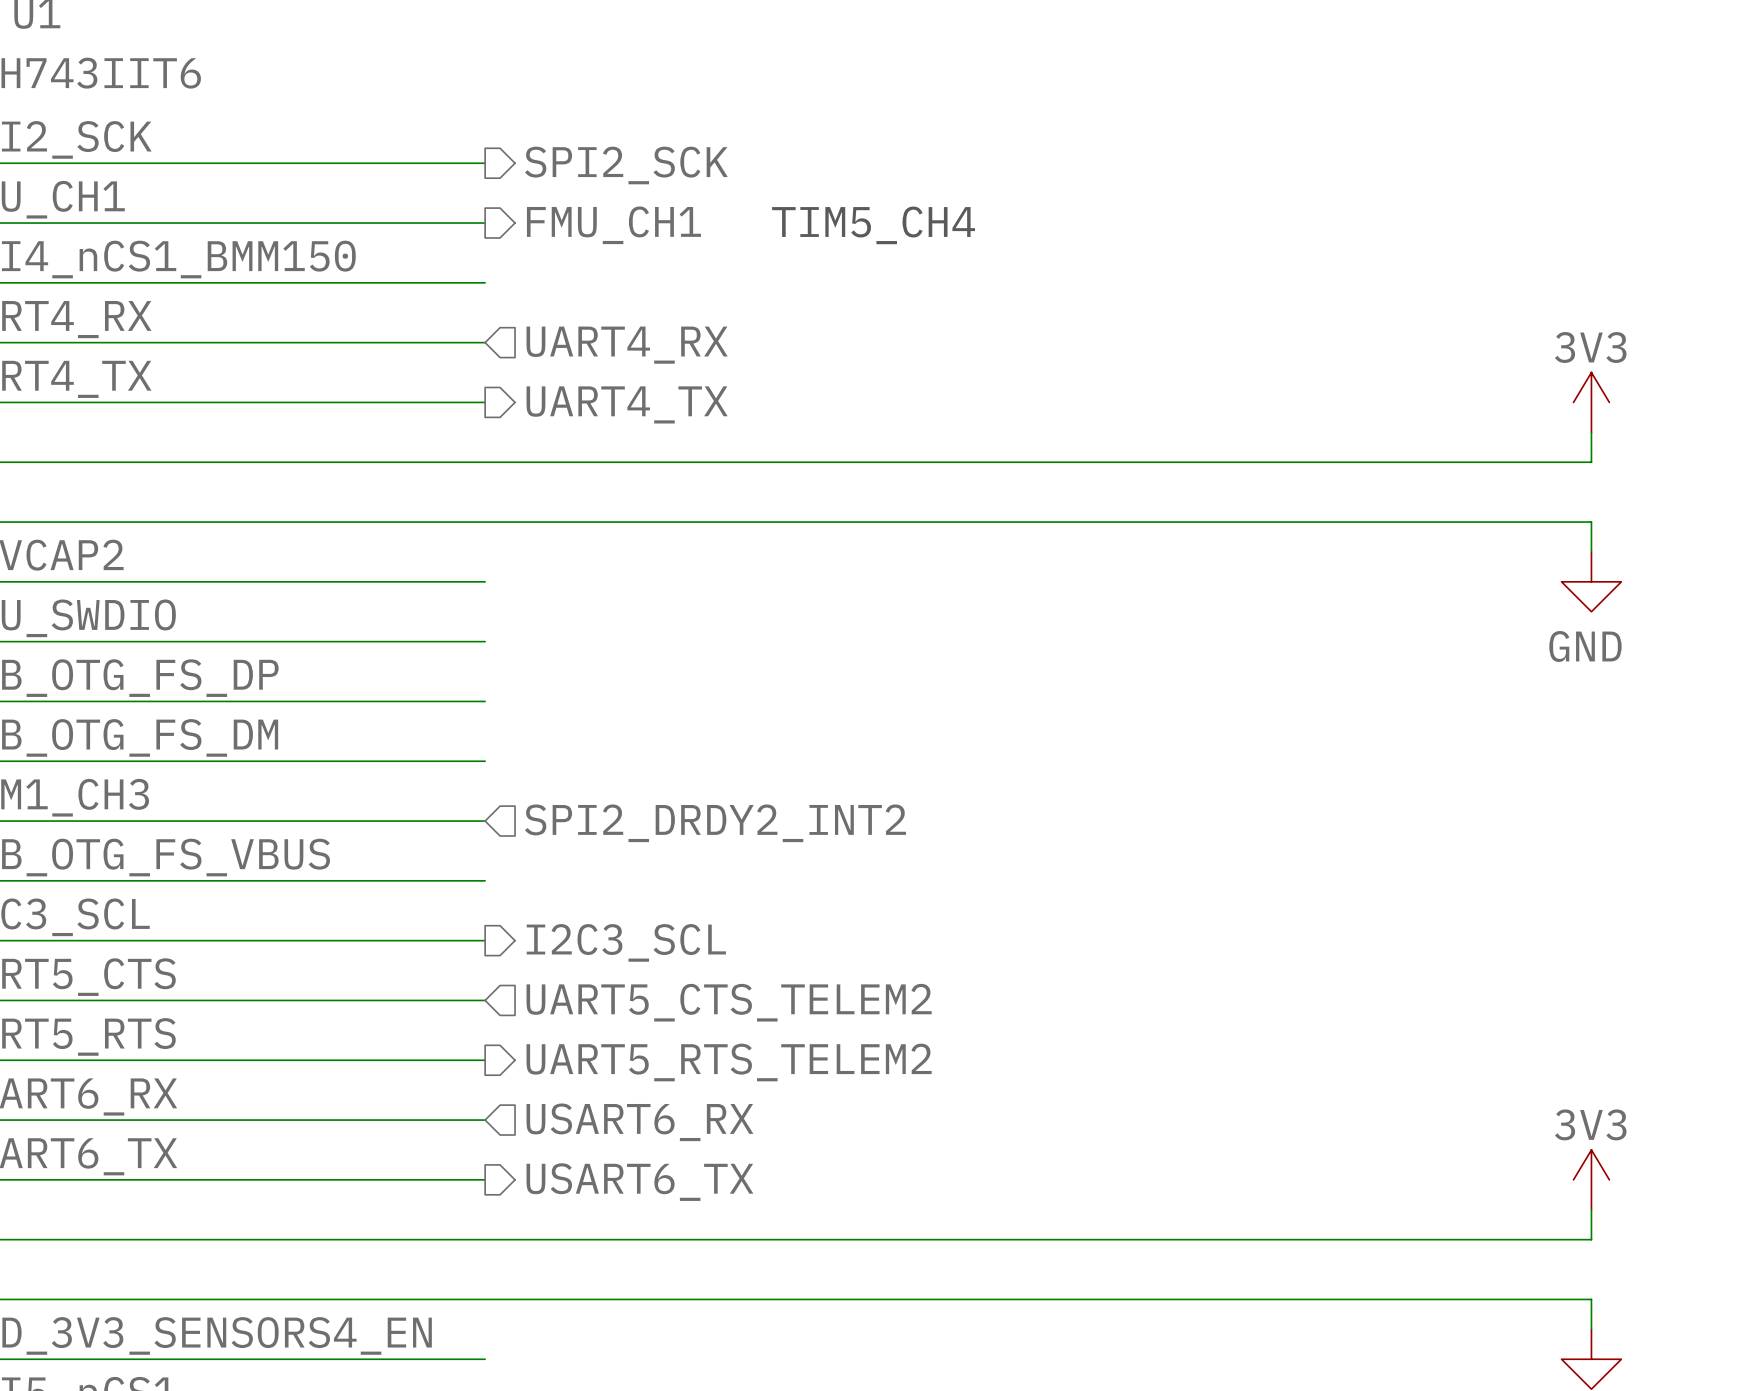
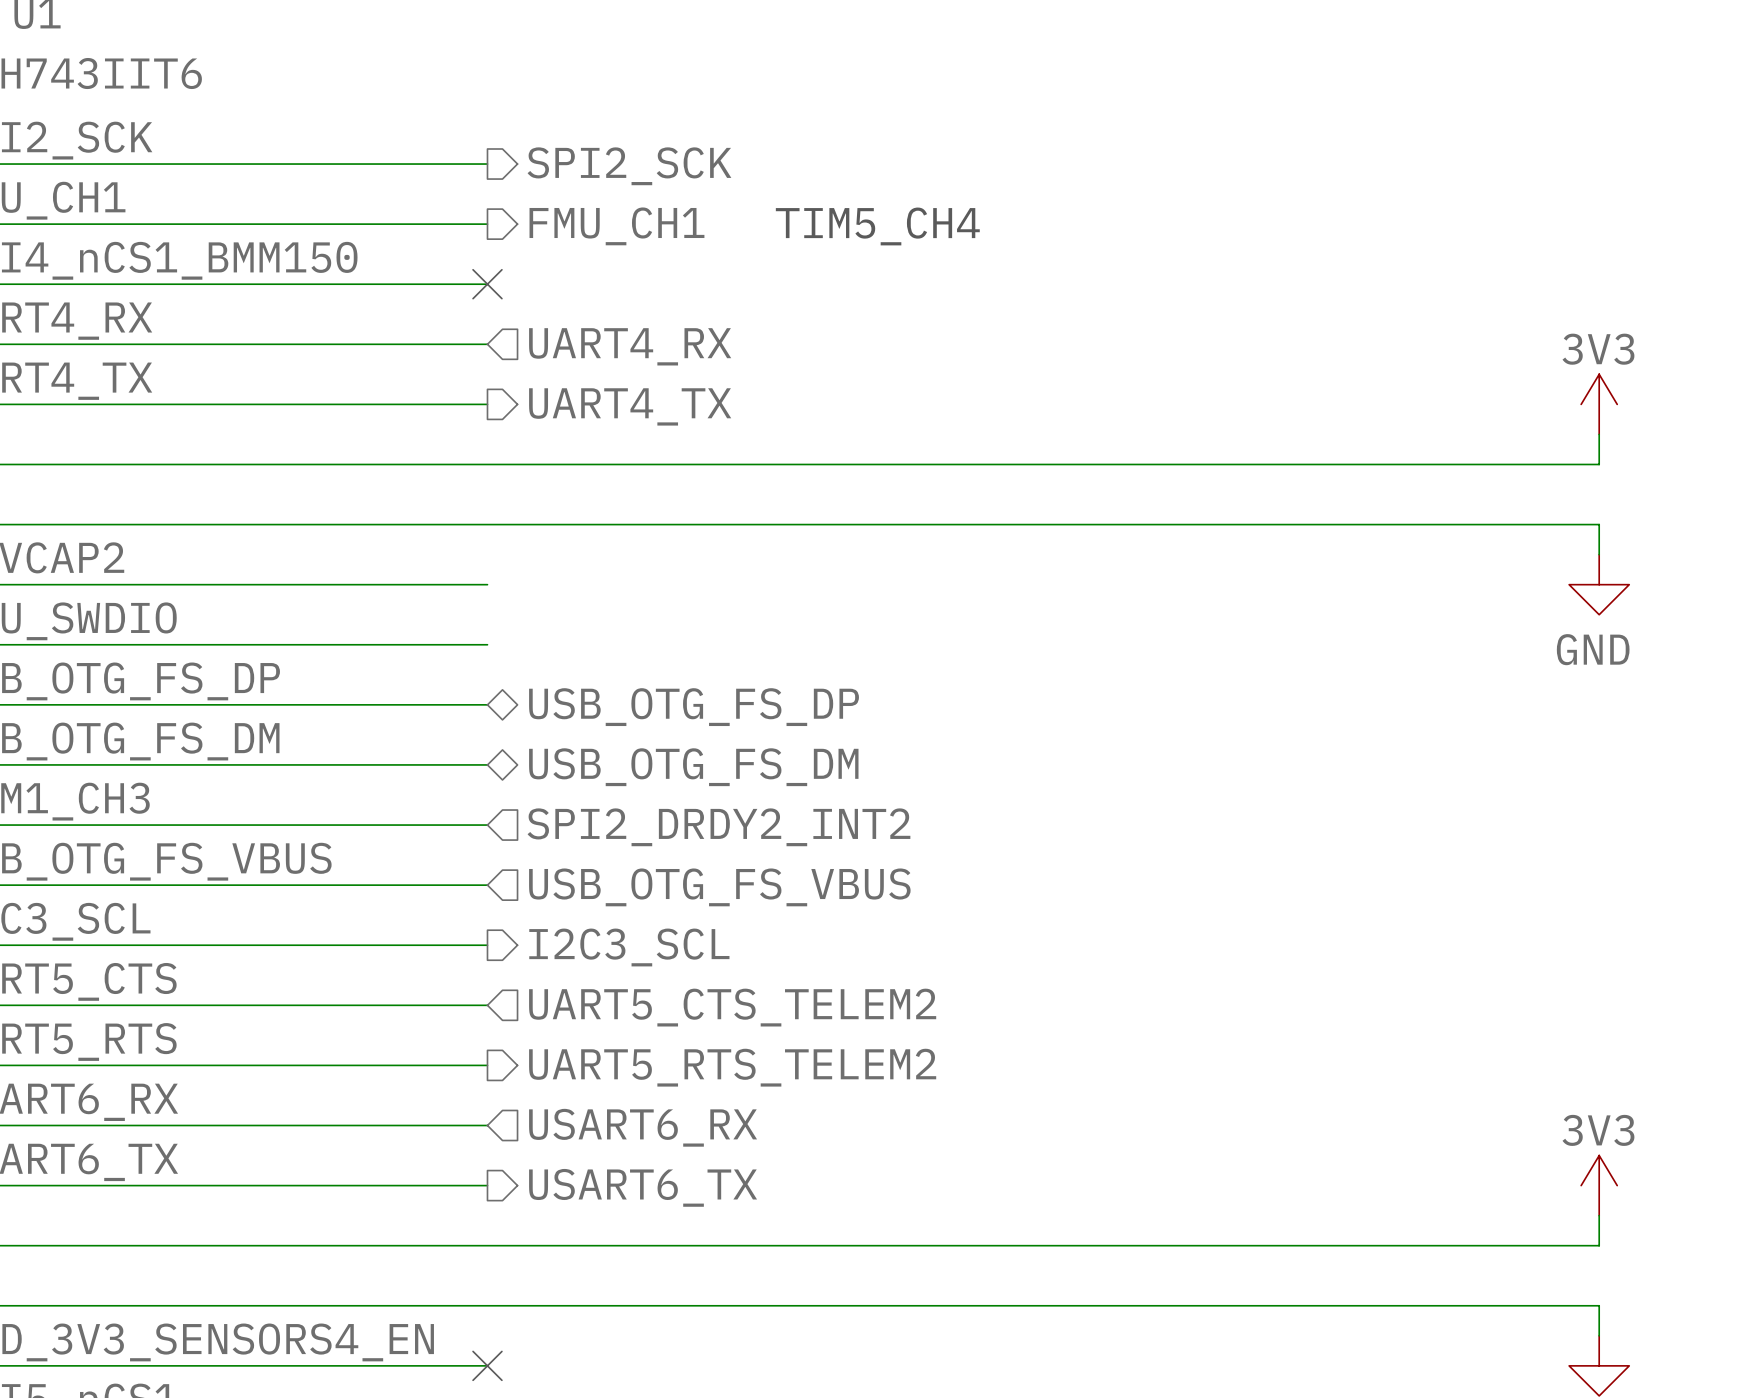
no-connect mark: none -> (487, 284)
hierarchical label: none -> USB_OTG_FS_DP (694, 707)
hierarchical label: none -> USB_OTG_FS_DM (693, 767)
hierarchical label: none -> USB_OTG_FS_VBUS (719, 887)
no-connect mark: none -> (487, 1365)

